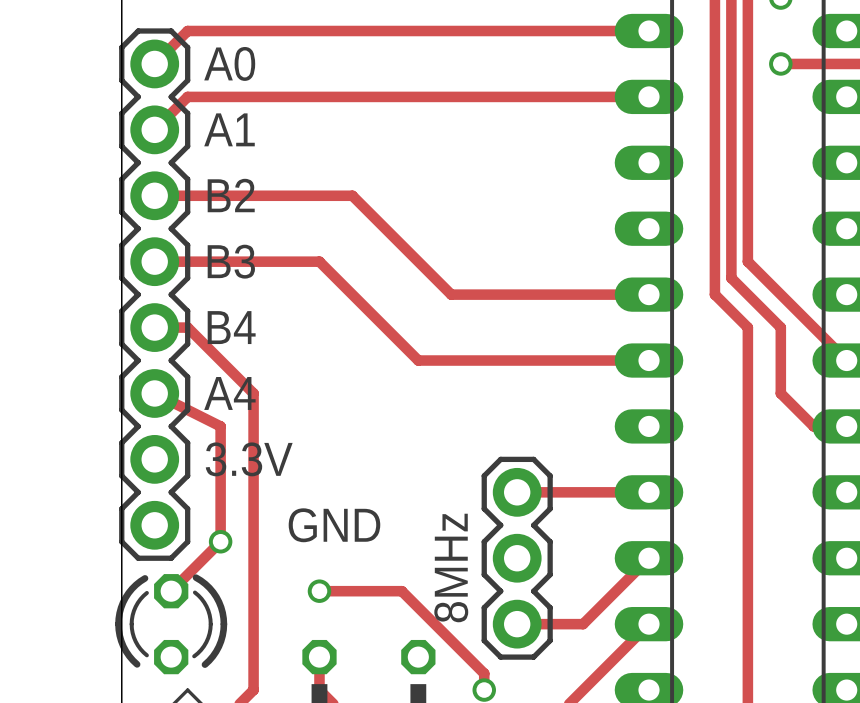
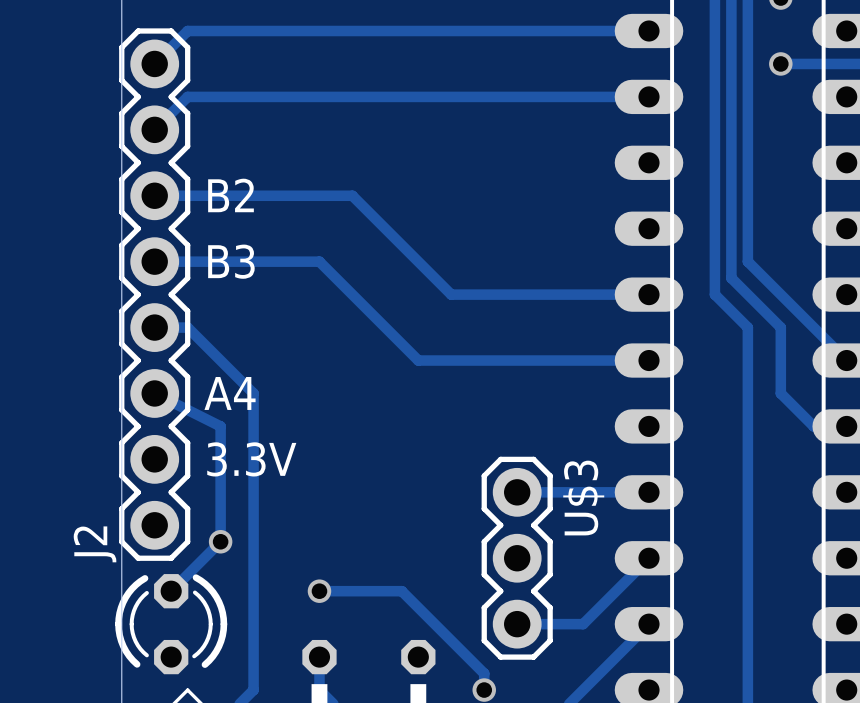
text: A0 (229, 63) -> none
text: A1 (229, 129) -> none
text: B4 (231, 327) -> none
U$3 name: none -> U$3 (583, 498)
text: GND (334, 525) -> none
J2 name: none -> J2 (95, 544)
text: 8MHz (451, 568) -> none

